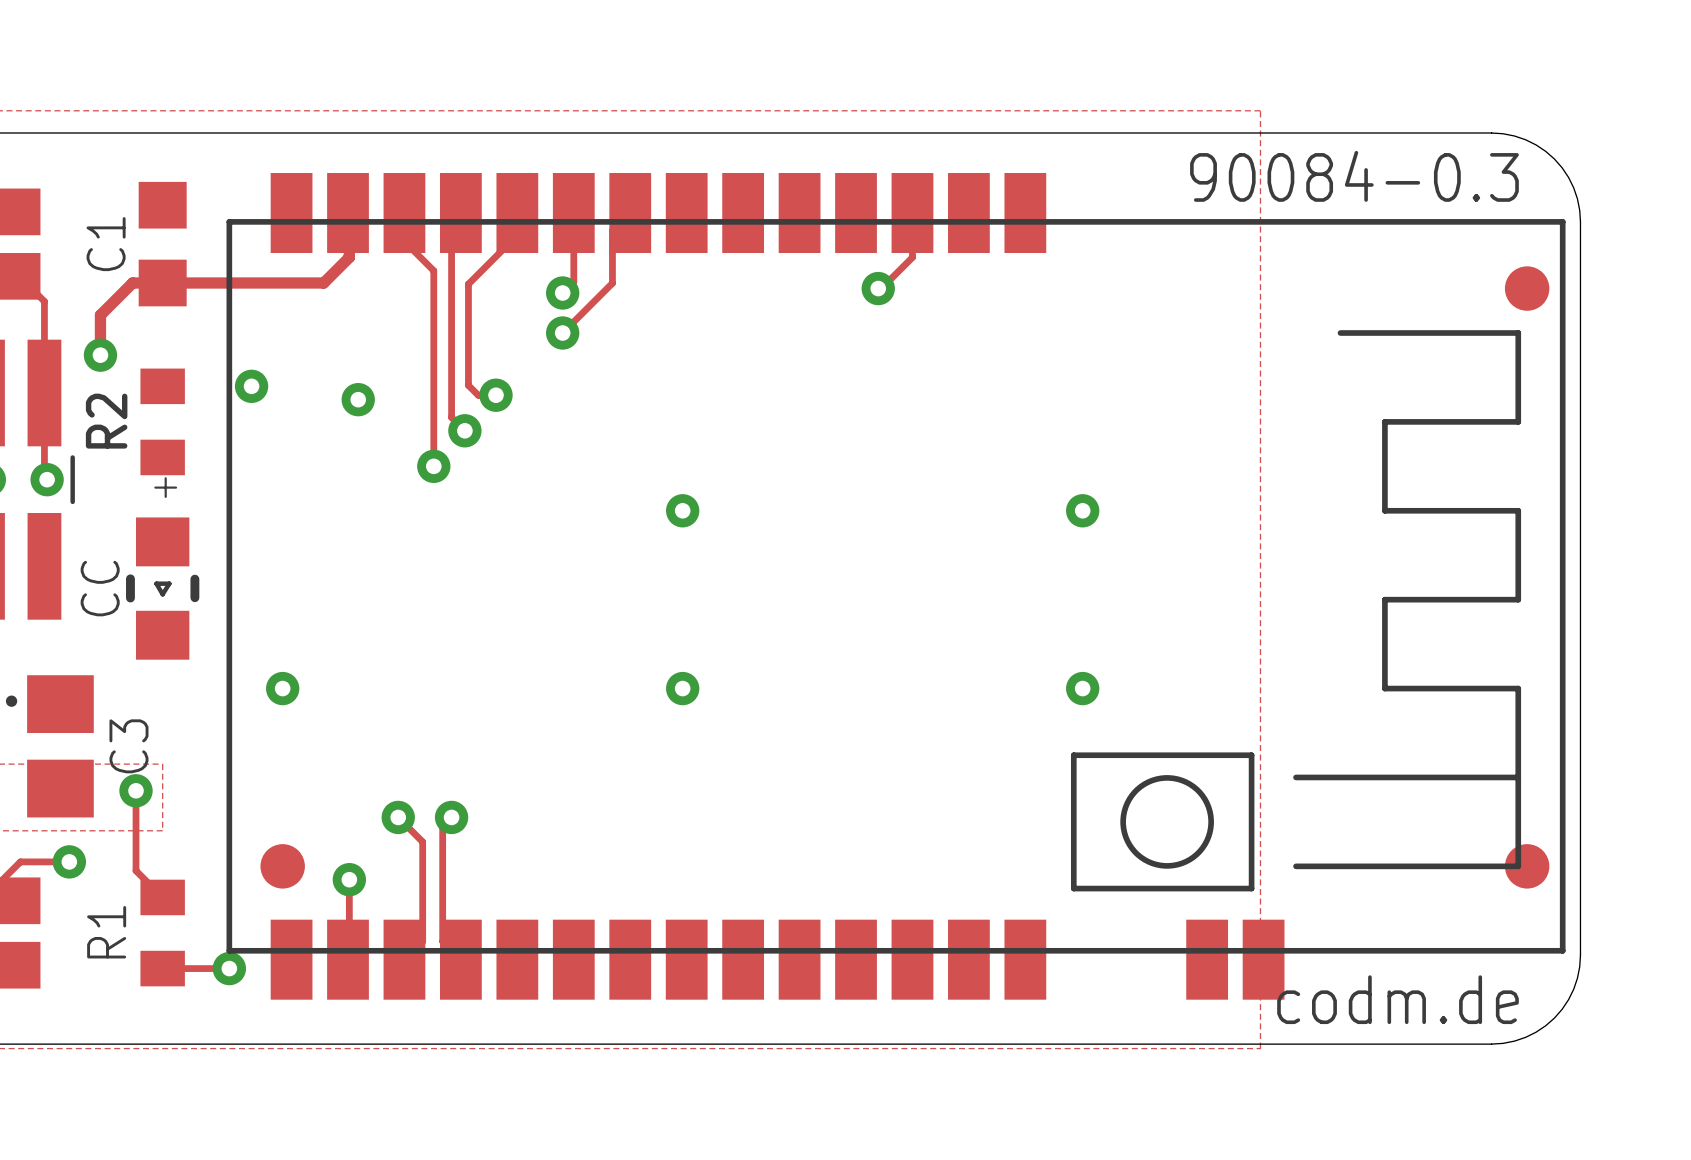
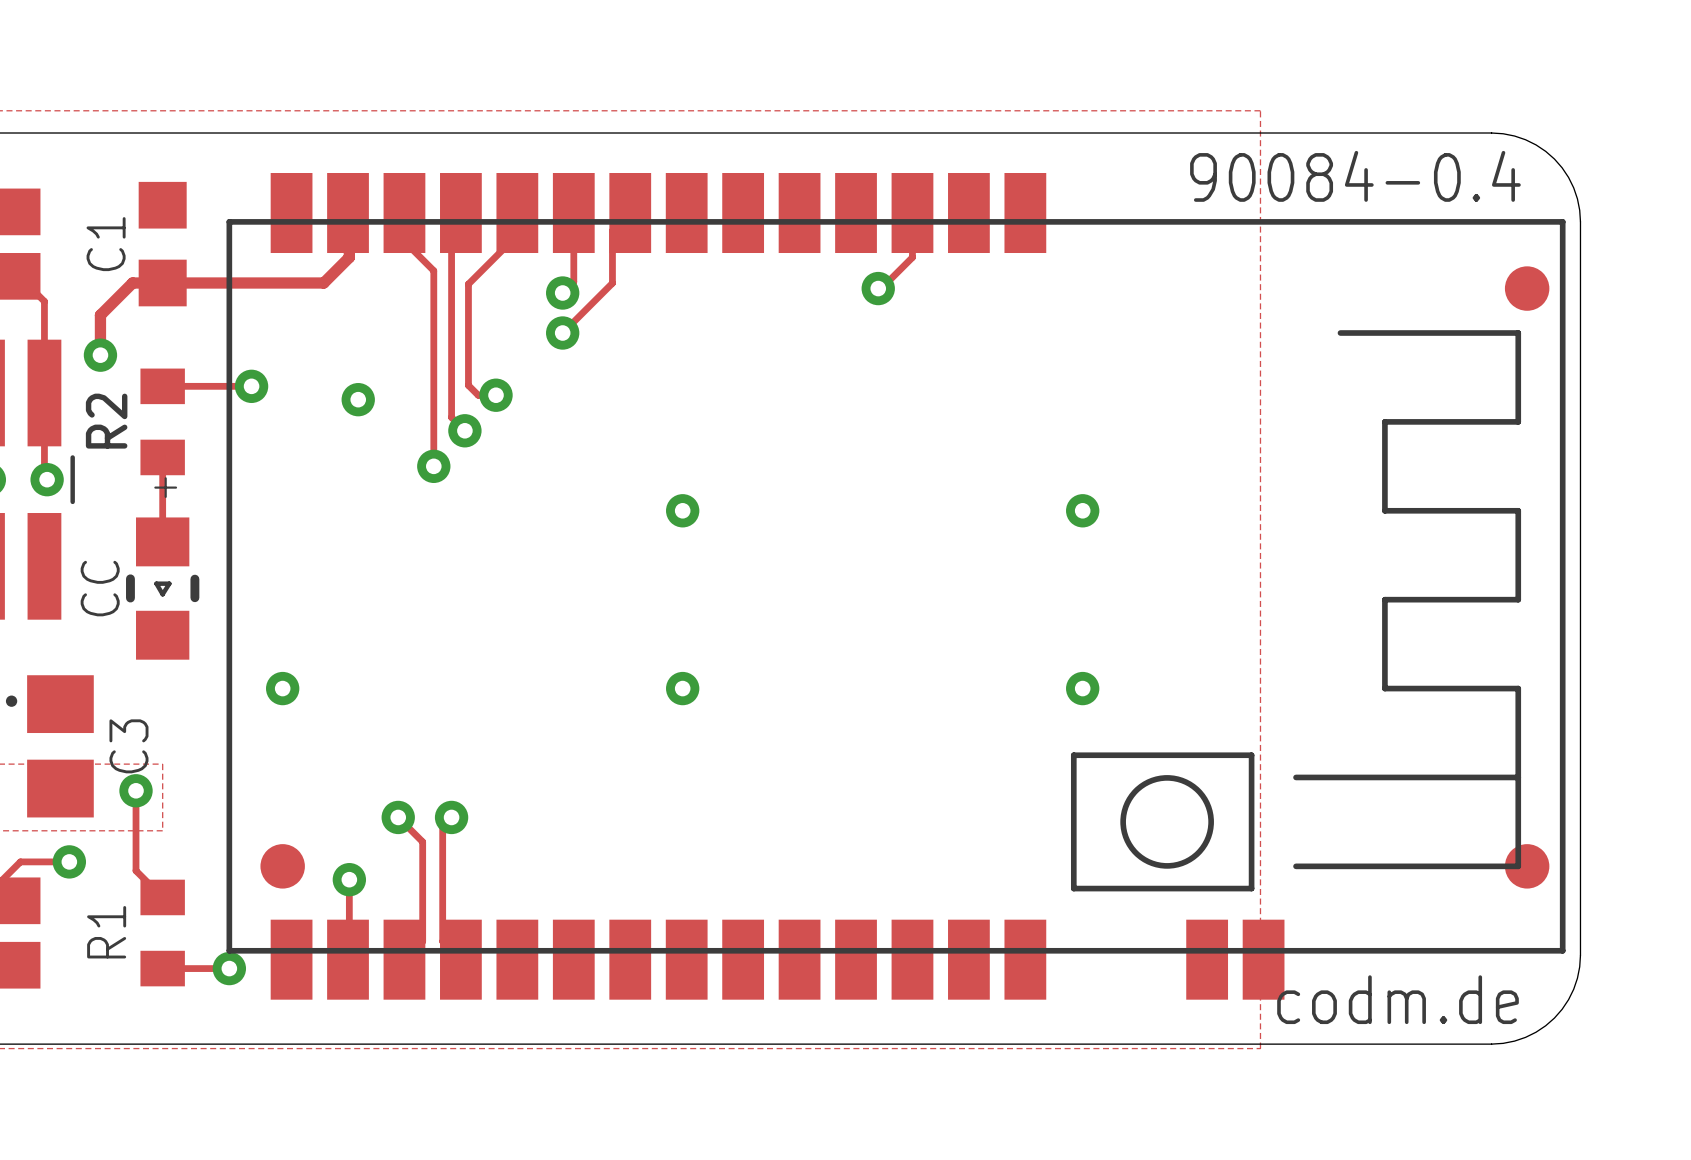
text: 90084-0.3 (1354, 176) -> 90084-0.4 (1355, 176)
track: none -> (162, 386) (251, 386)
track: none -> (162, 457) (162, 541)

